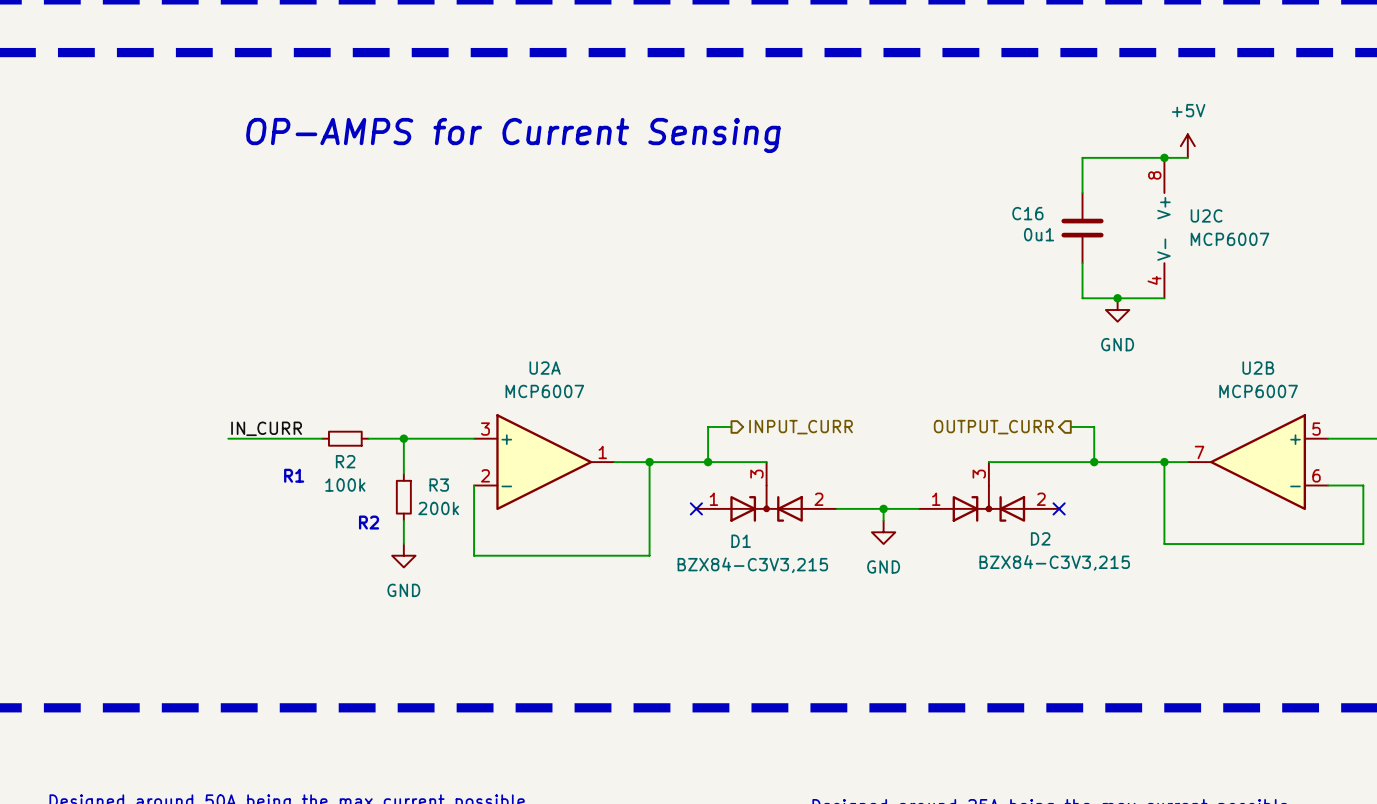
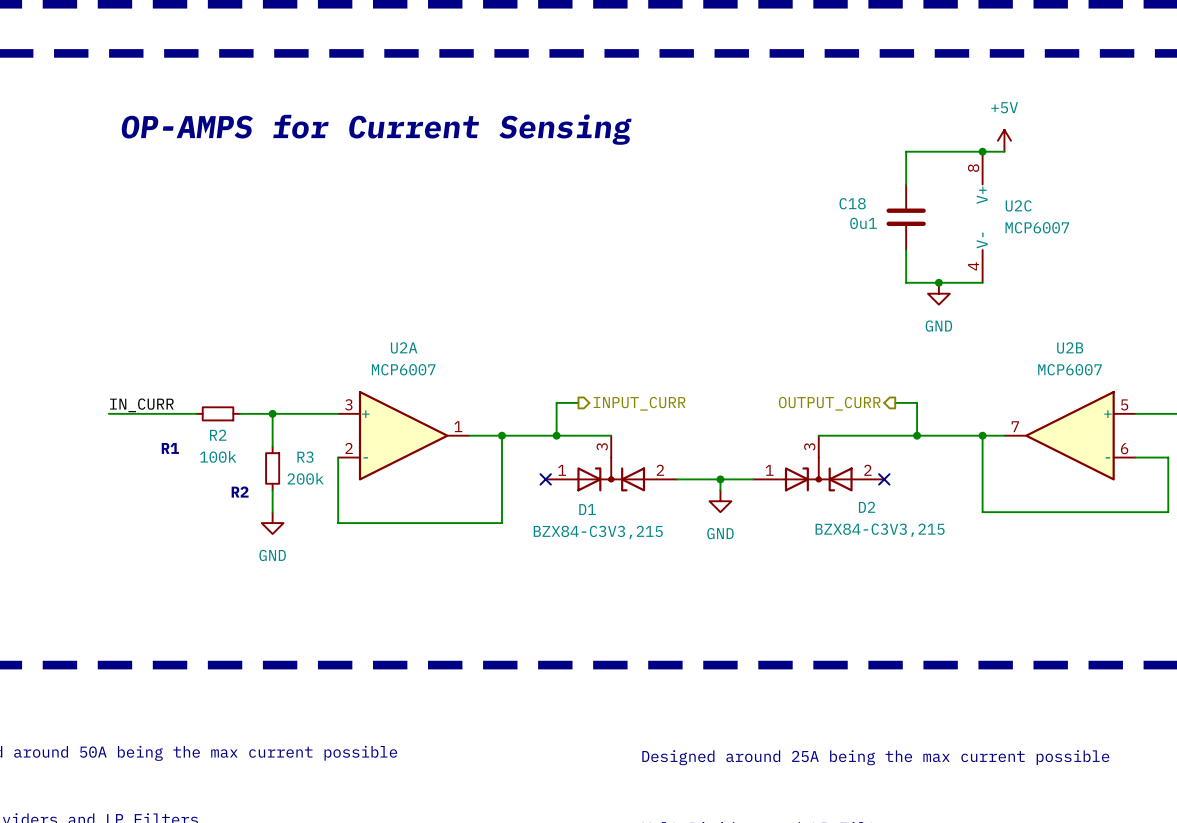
C16 name: C16 (1027, 213) -> C18 (852, 203)

